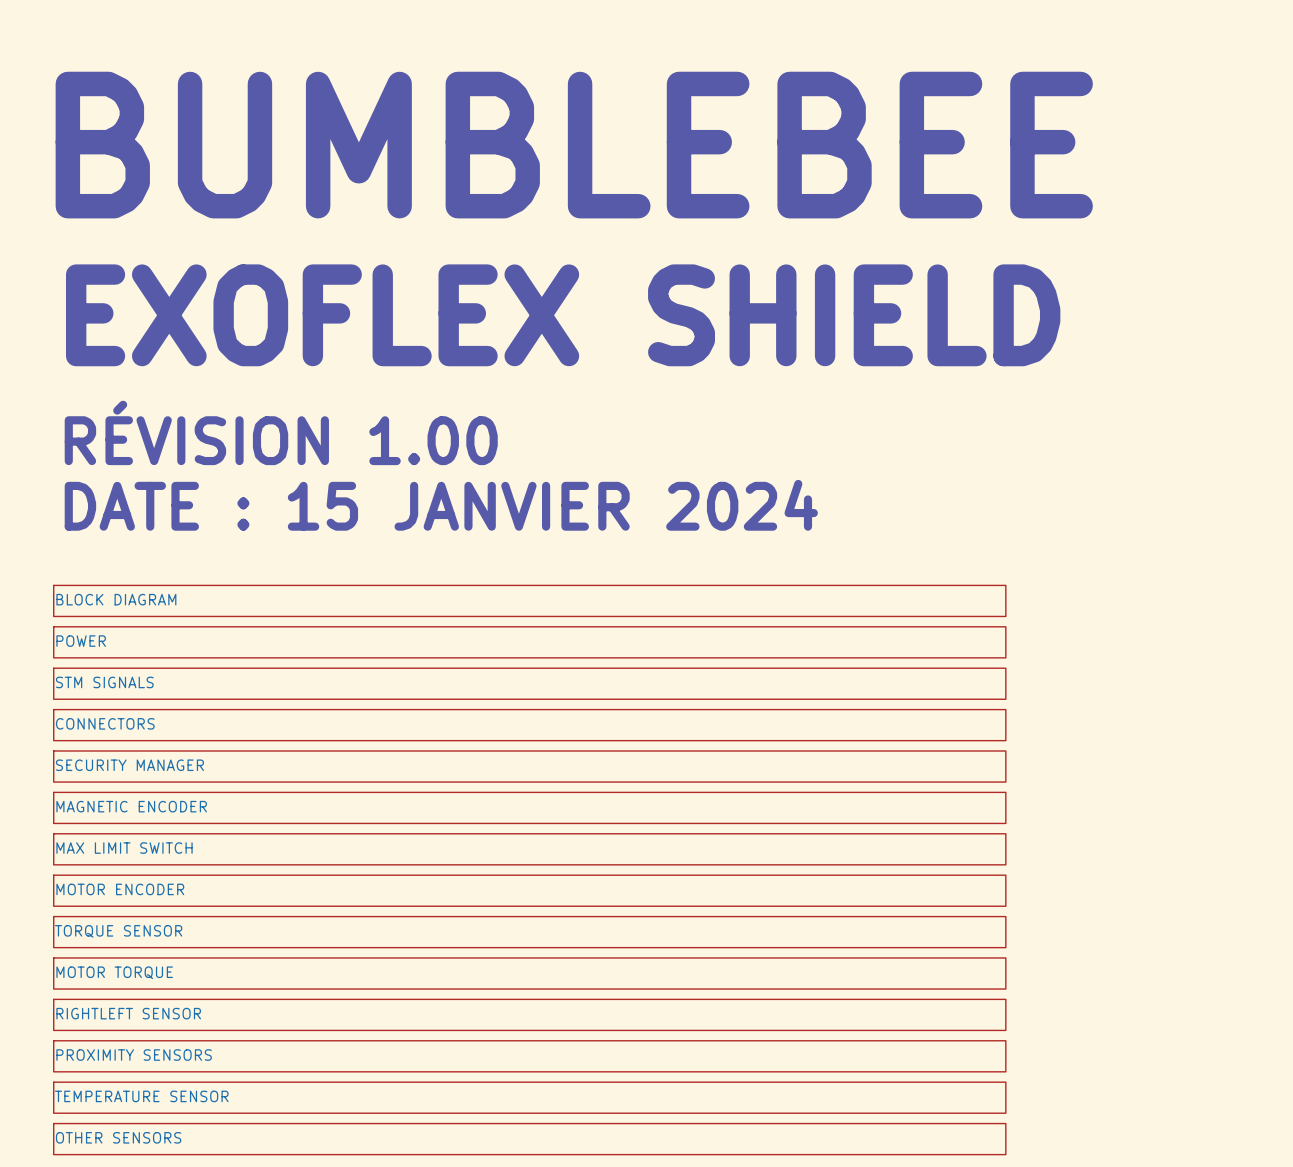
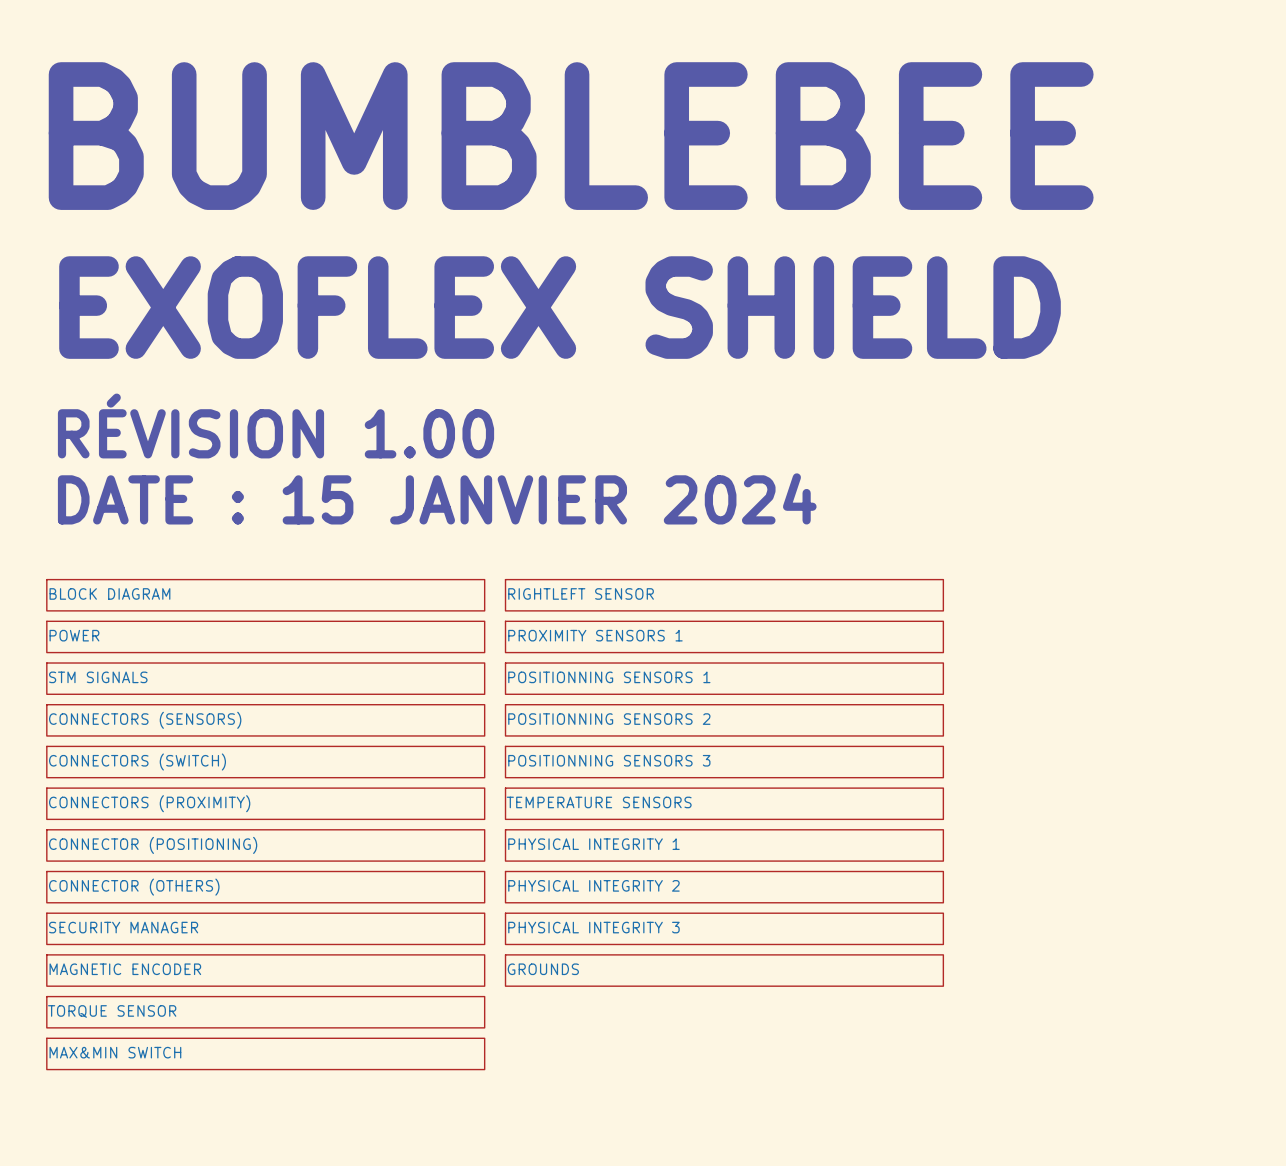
sheet BLOCK DIAGRAM: none -> (265, 595)
sheet BLOCK DIAGRAM: (529, 600) -> none
sheet RIGHTLEFT SENSOR: none -> (724, 595)
sheet POWER: none -> (265, 636)
sheet POWER: (529, 642) -> none
sheet PROXIMITY SENSORS 1: none -> (724, 636)
sheet STM SIGNALS: none -> (265, 678)
sheet STM SIGNALS: (529, 683) -> none
sheet POSITIONNING SENSORS 1: none -> (724, 678)
sheet CONNECTORS (SENSORS): none -> (265, 720)
sheet CONNECTORS: (529, 725) -> none
sheet POSITIONNING SENSORS 2: none -> (724, 720)
sheet CONNECTORS (SWITCH): none -> (265, 762)
sheet SECURITY MANAGER: (529, 766) -> none
sheet POSITIONNING SENSORS 3: none -> (724, 762)
sheet CONNECTORS (PROXIMITY): none -> (265, 803)
sheet MAGNETIC ENCODER: (529, 807) -> none
sheet TEMPERATURE SENSORS: none -> (724, 803)
sheet CONNECTOR (POSITIONING): none -> (265, 845)
sheet MAX LIMIT SWITCH: (529, 849) -> none
sheet PHYSICAL INTEGRITY 1: none -> (724, 845)
sheet CONNECTOR (OTHERS): none -> (265, 887)
sheet MOTOR ENCODER: (529, 890) -> none
sheet PHYSICAL INTEGRITY 2: none -> (724, 887)
sheet SECURITY MANAGER: none -> (265, 928)
sheet TORQUE SENSOR: (529, 932) -> none
sheet PHYSICAL INTEGRITY 3: none -> (724, 928)
sheet MAGNETIC ENCODER: none -> (265, 970)
sheet MOTOR TORQUE: (529, 973) -> none
sheet GROUNDS: none -> (724, 970)
sheet TORQUE SENSOR: none -> (265, 1012)
sheet RIGHTLEFT SENSOR: (529, 1014) -> none
sheet MAX&MIN SWITCH: none -> (265, 1053)
sheet PROXIMITY SENSORS: (529, 1056) -> none
sheet TEMPERATURE SENSOR: (529, 1097) -> none
sheet OTHER SENSORS: (529, 1139) -> none

